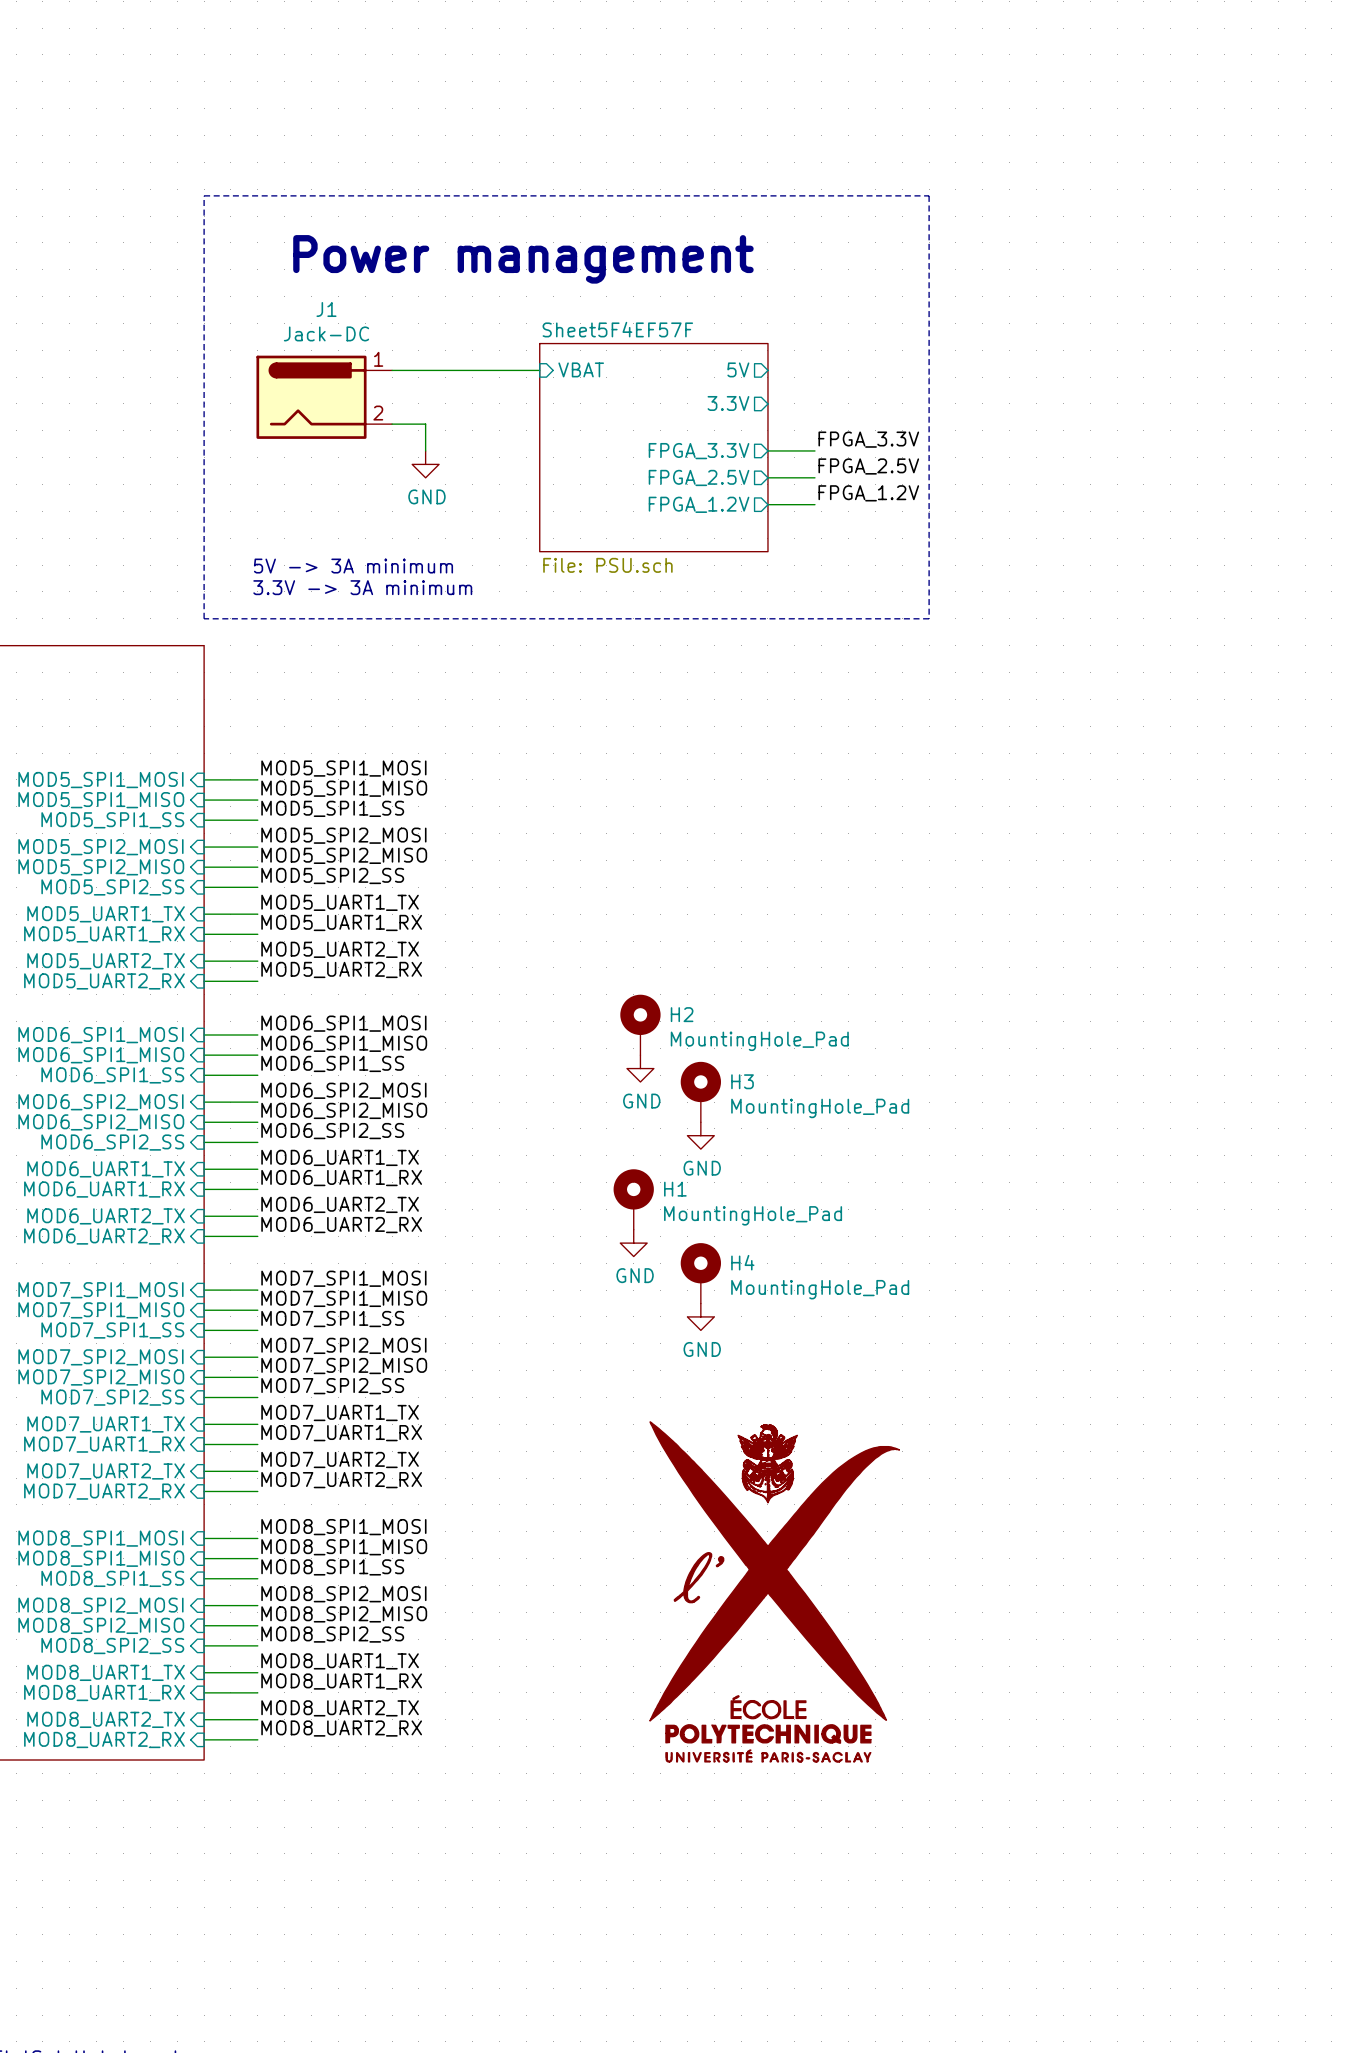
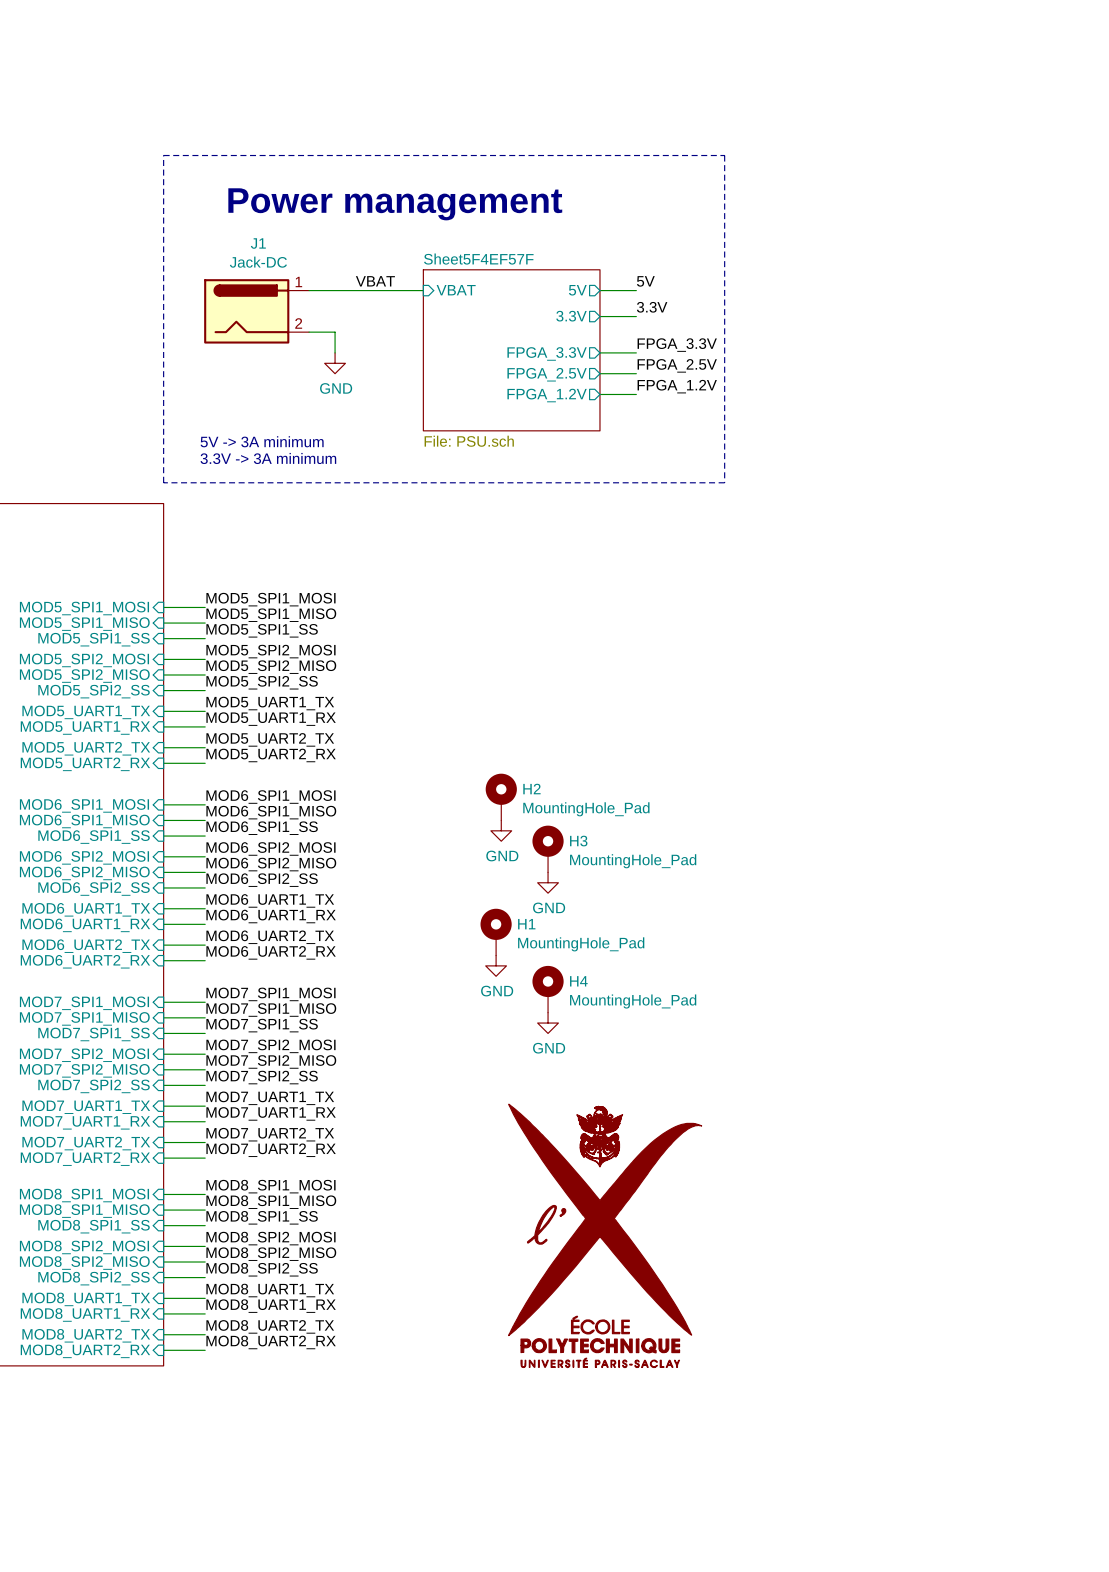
label: none -> VBAT (375, 281)
label: none -> 5V (645, 281)
wire: none -> (599, 290) (636, 290)
label: none -> 3.3V (652, 307)
wire: none -> (599, 316) (636, 316)

